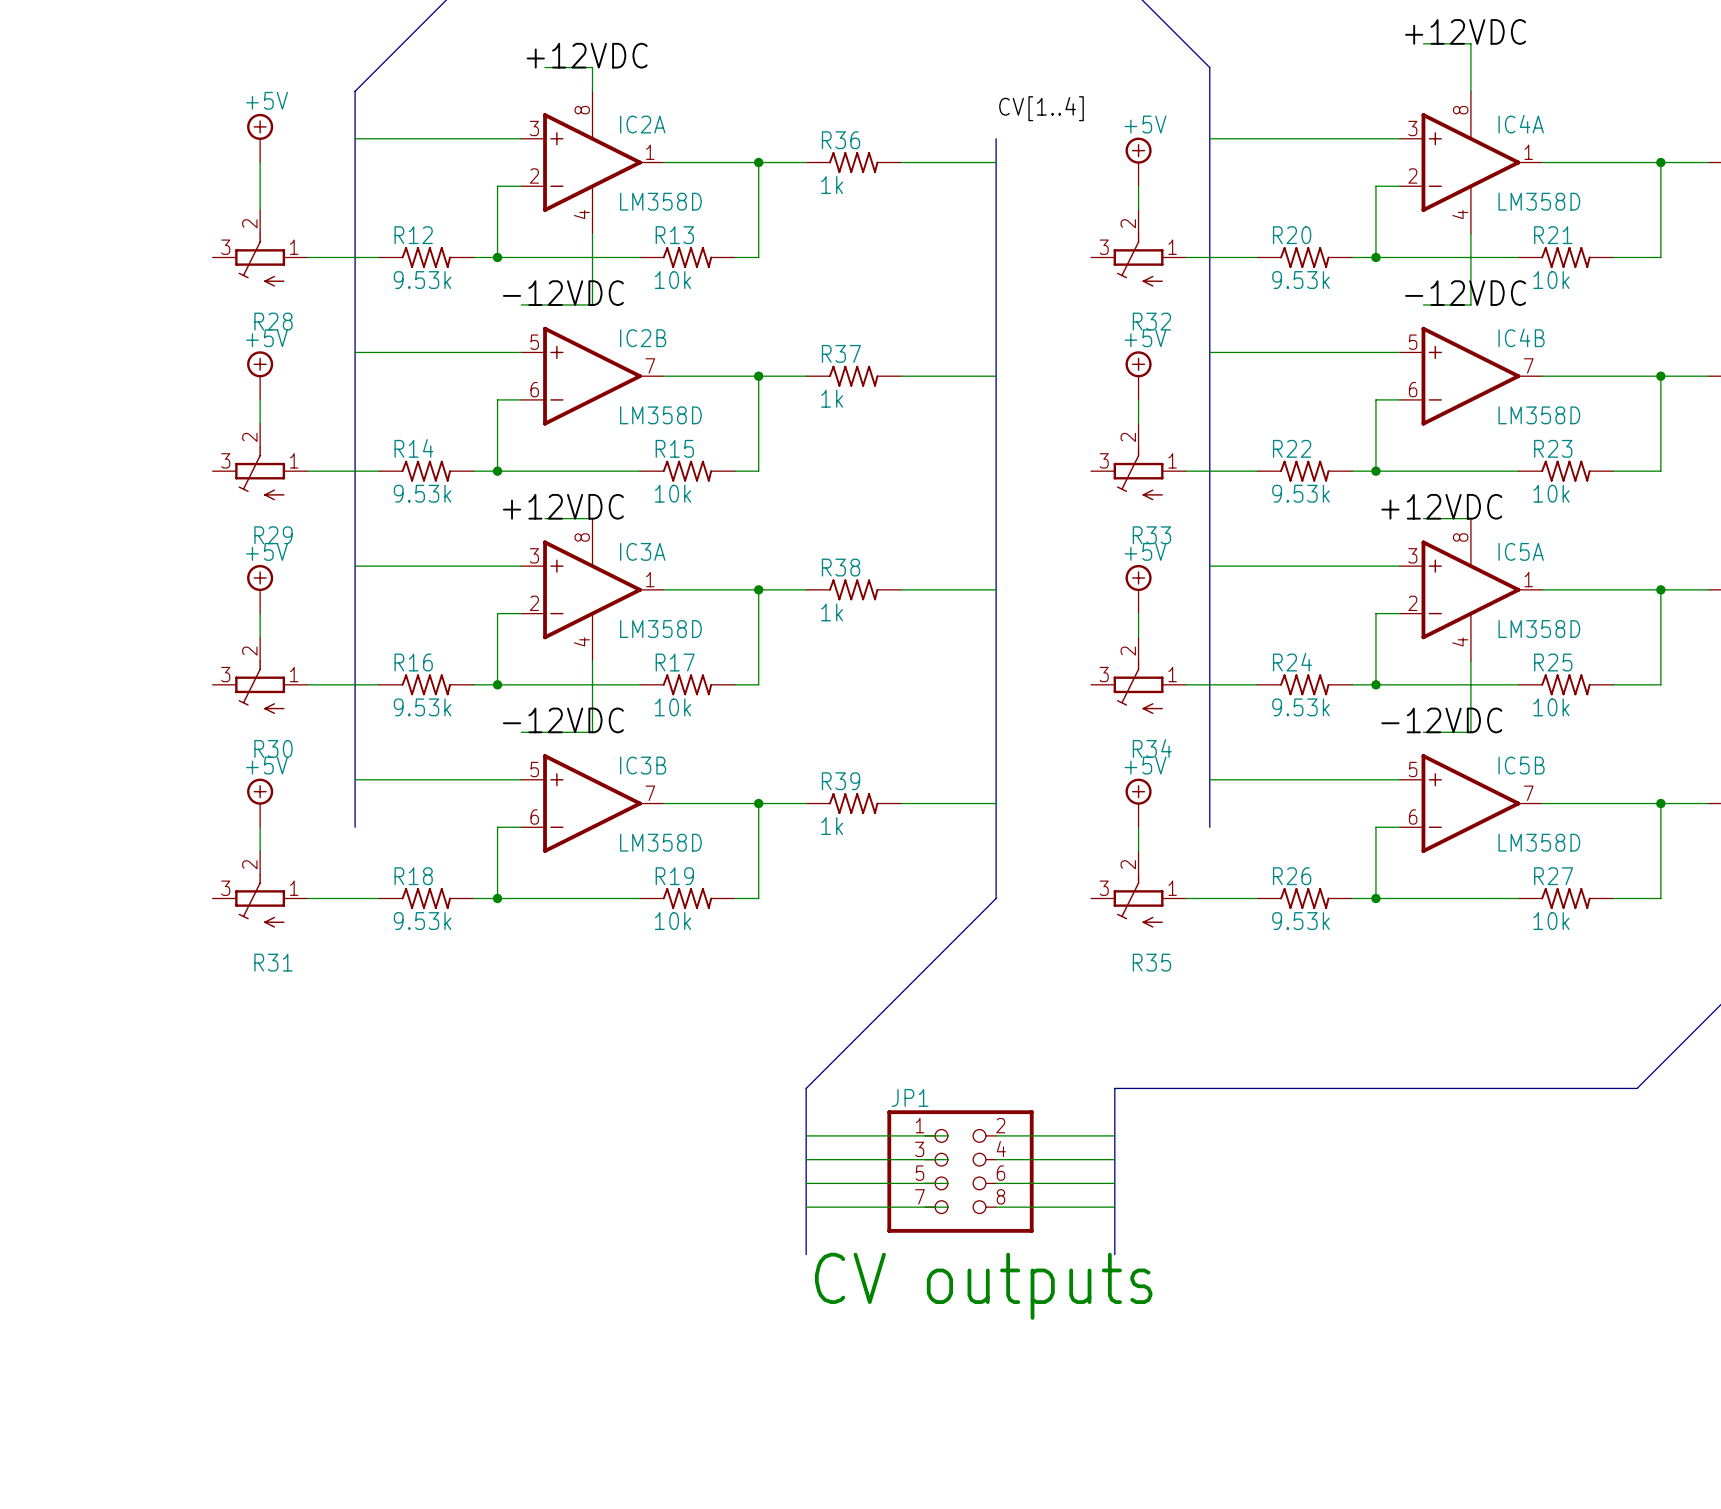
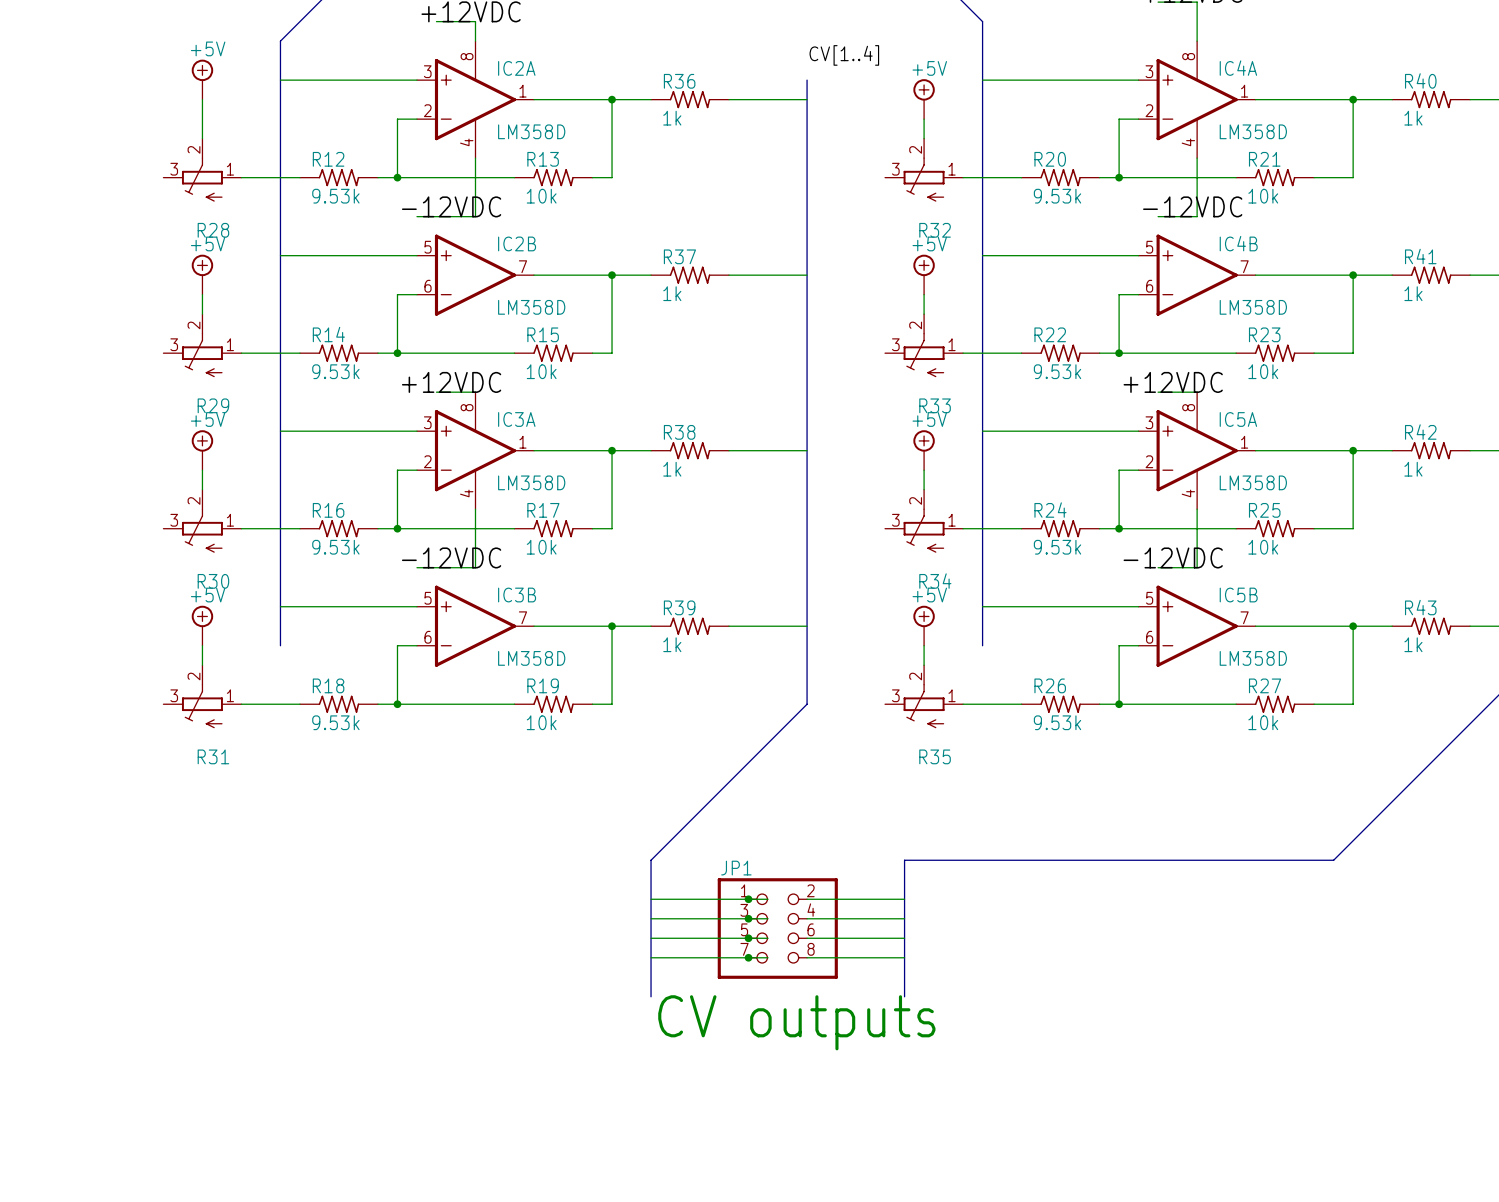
junction: none -> (748, 899)
junction: none -> (748, 918)
junction: none -> (748, 938)
junction: none -> (748, 957)

